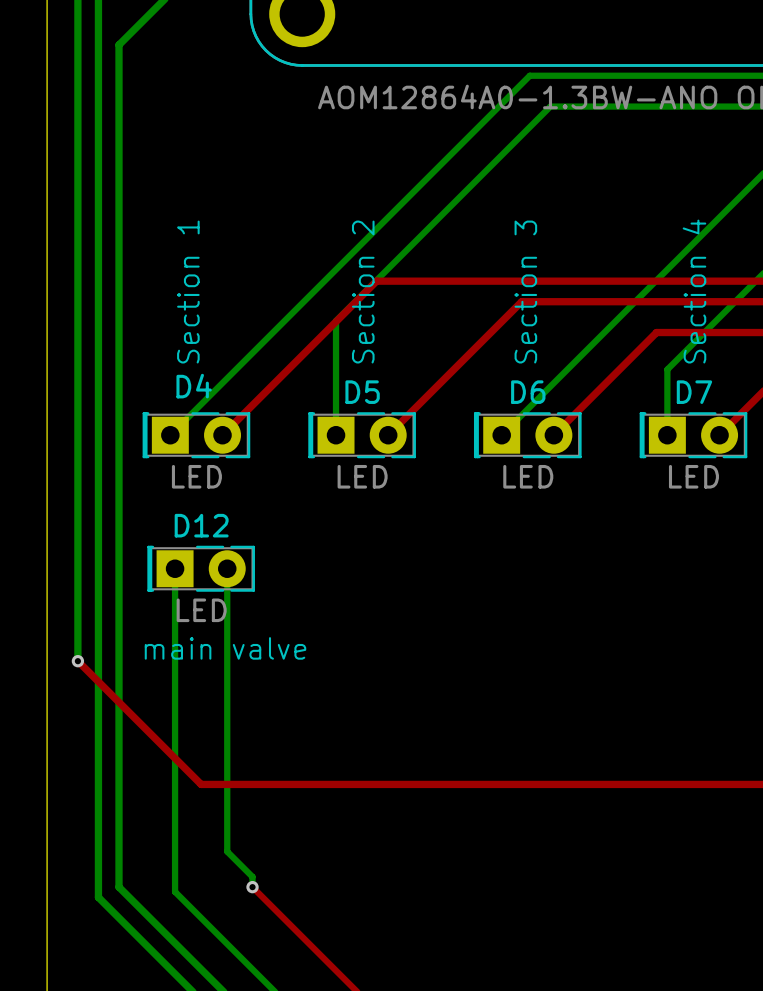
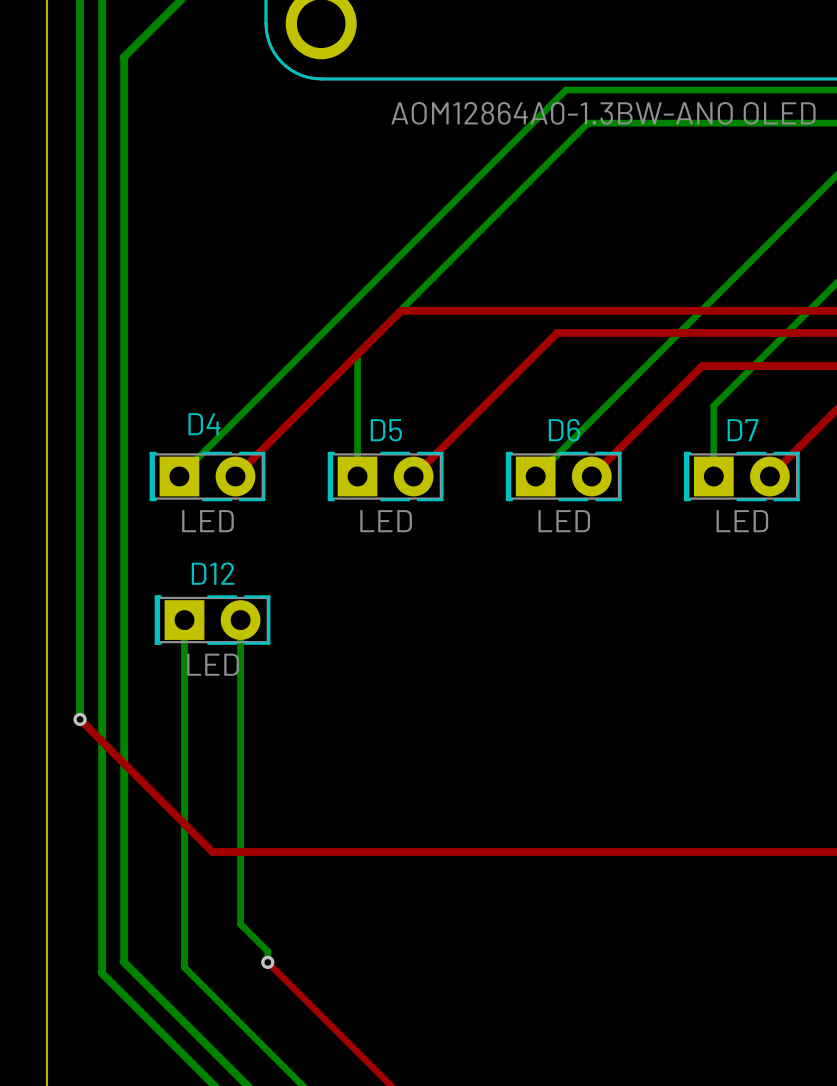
text: Section 4 (694, 291) -> none
text: Section 1 (188, 292) -> none
text: Section 2 (363, 292) -> none
text: Section 3 (525, 292) -> none
text: main valve (225, 648) -> none

